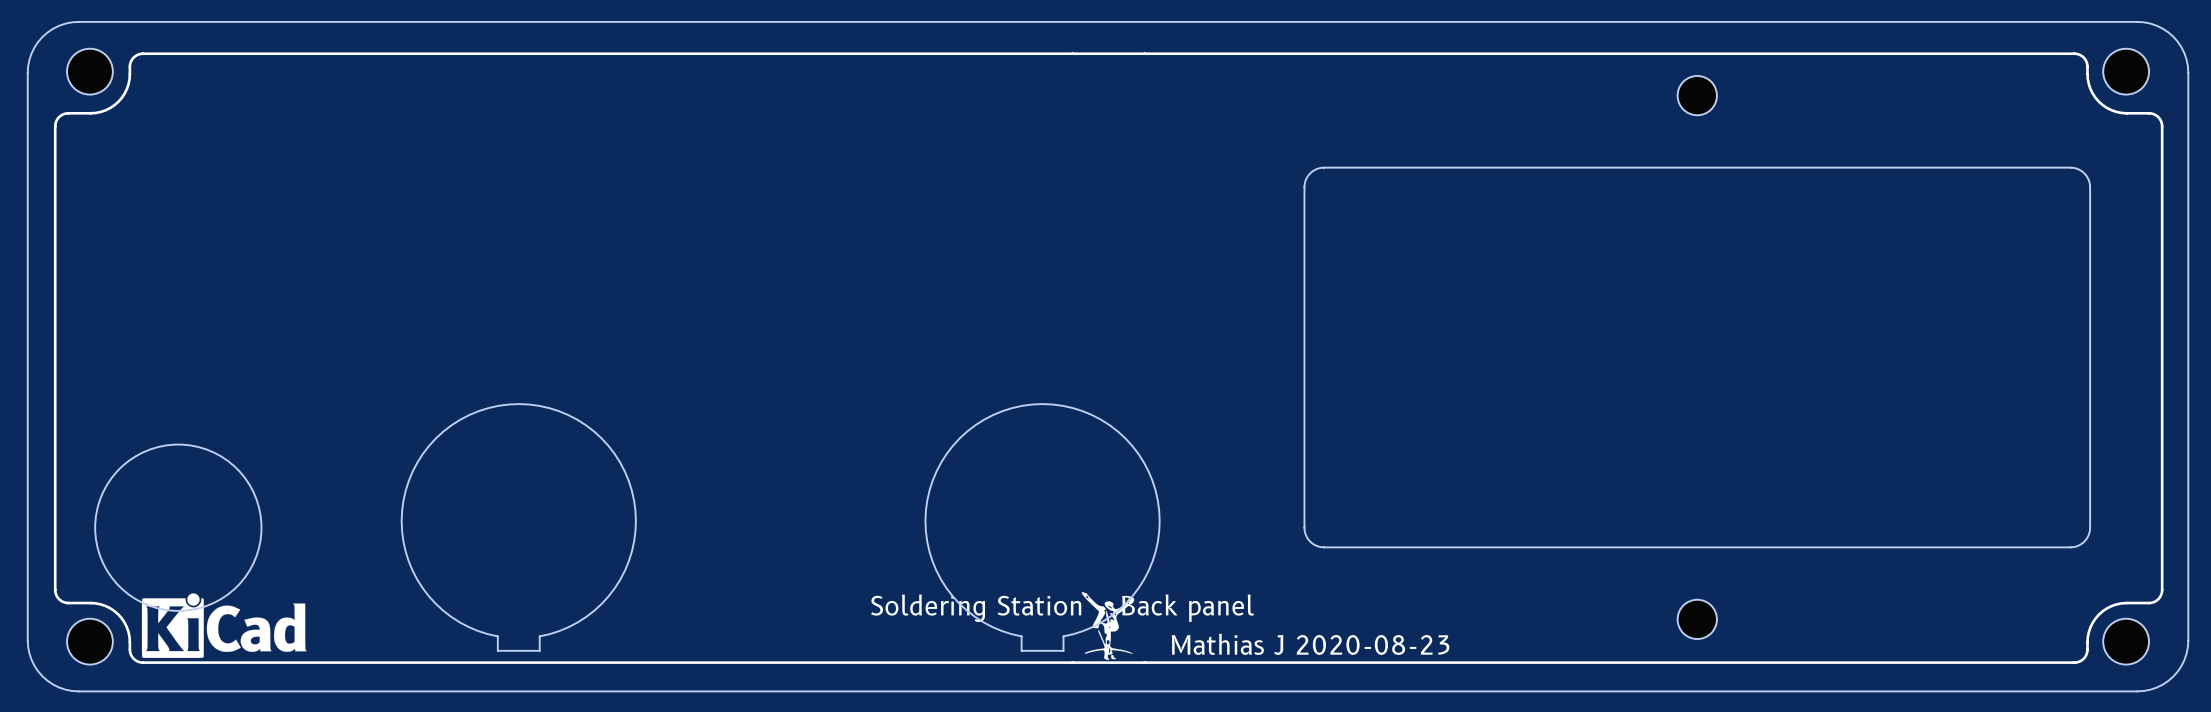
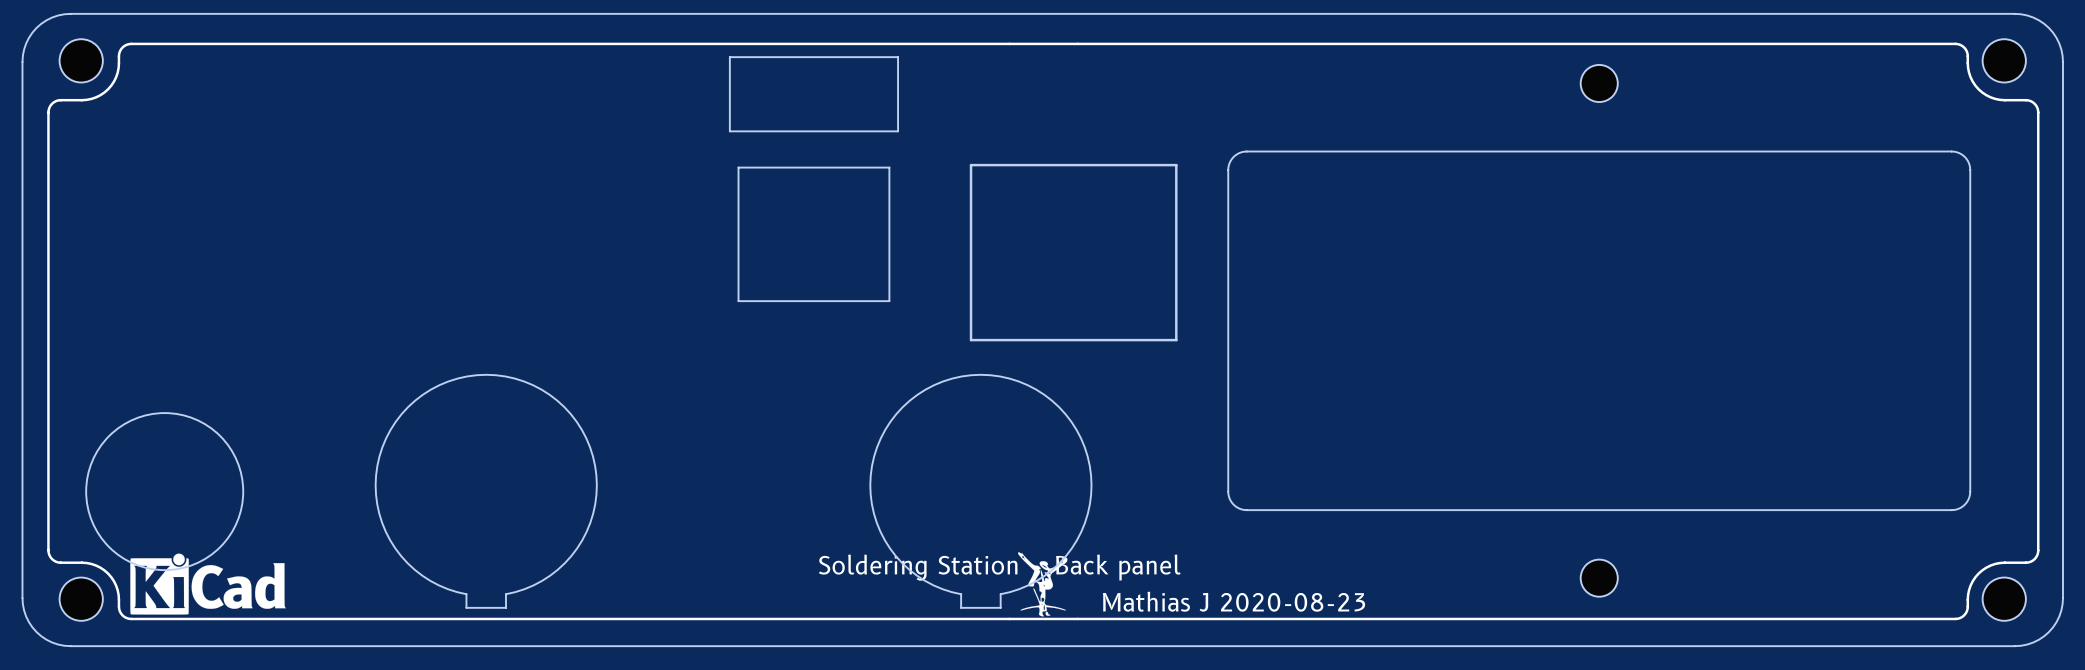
drawing: none -> [729, 56, 899, 133]
drawing: none -> [969, 163, 1178, 342]
drawing: none -> [737, 166, 891, 302]

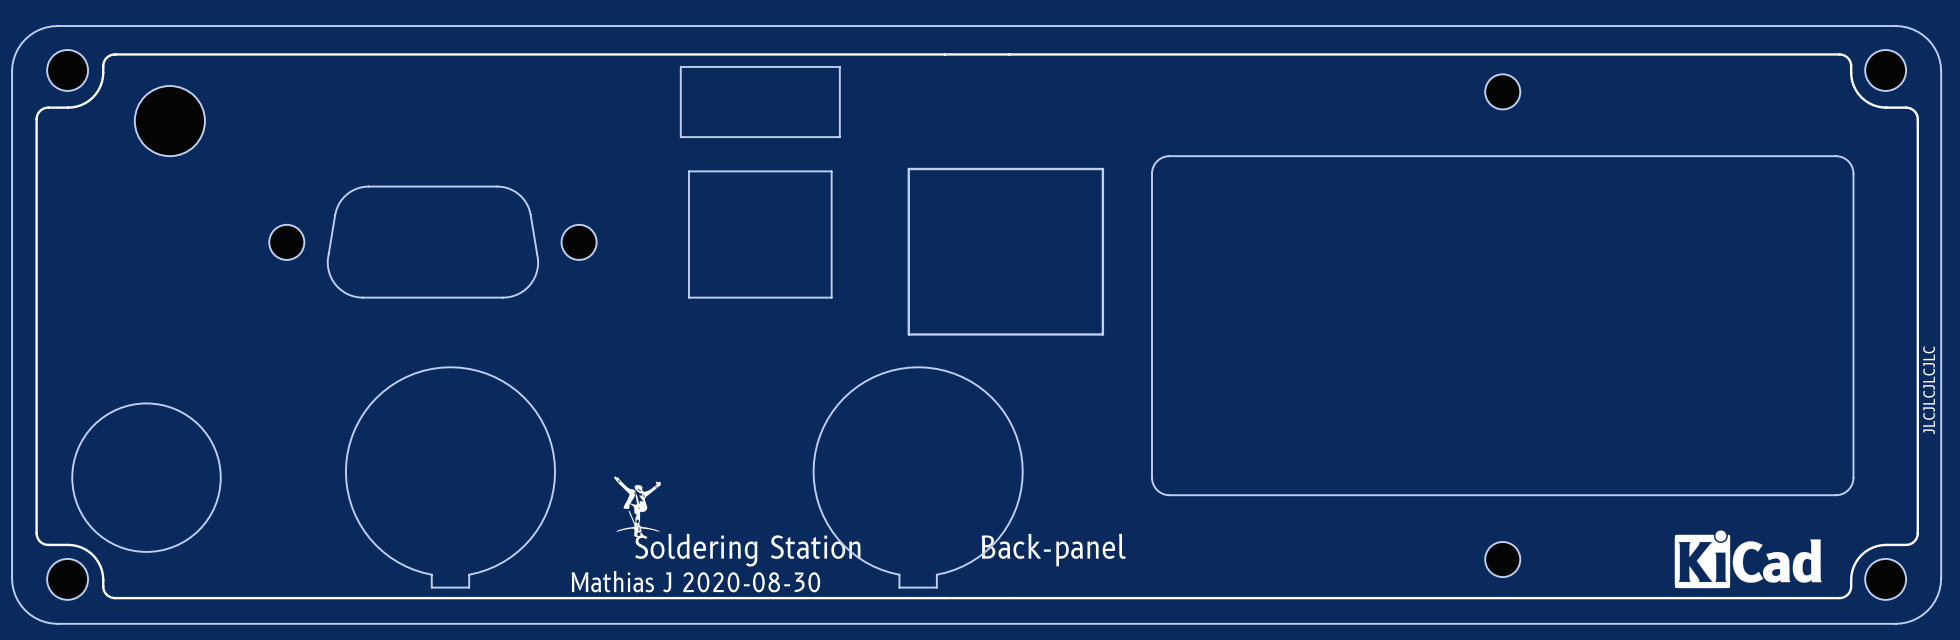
part: none -> (169, 121)
part: none -> (432, 242)
text: none -> JLCJLCJLCJLC (1929, 390)
drawing: none -> [614, 476, 661, 538]
drawing: none -> [1674, 530, 1822, 589]
drawing: [1017, 552, 1068, 617] -> none
drawing: [130, 553, 286, 615] -> none
text: Soldering Station Back panel (999, 567) -> Soldering Station Back-panel (880, 550)
text: none -> Mathias J 2020-08-30 (695, 581)
text: Mathias J 2020-08-23 (1234, 601) -> none

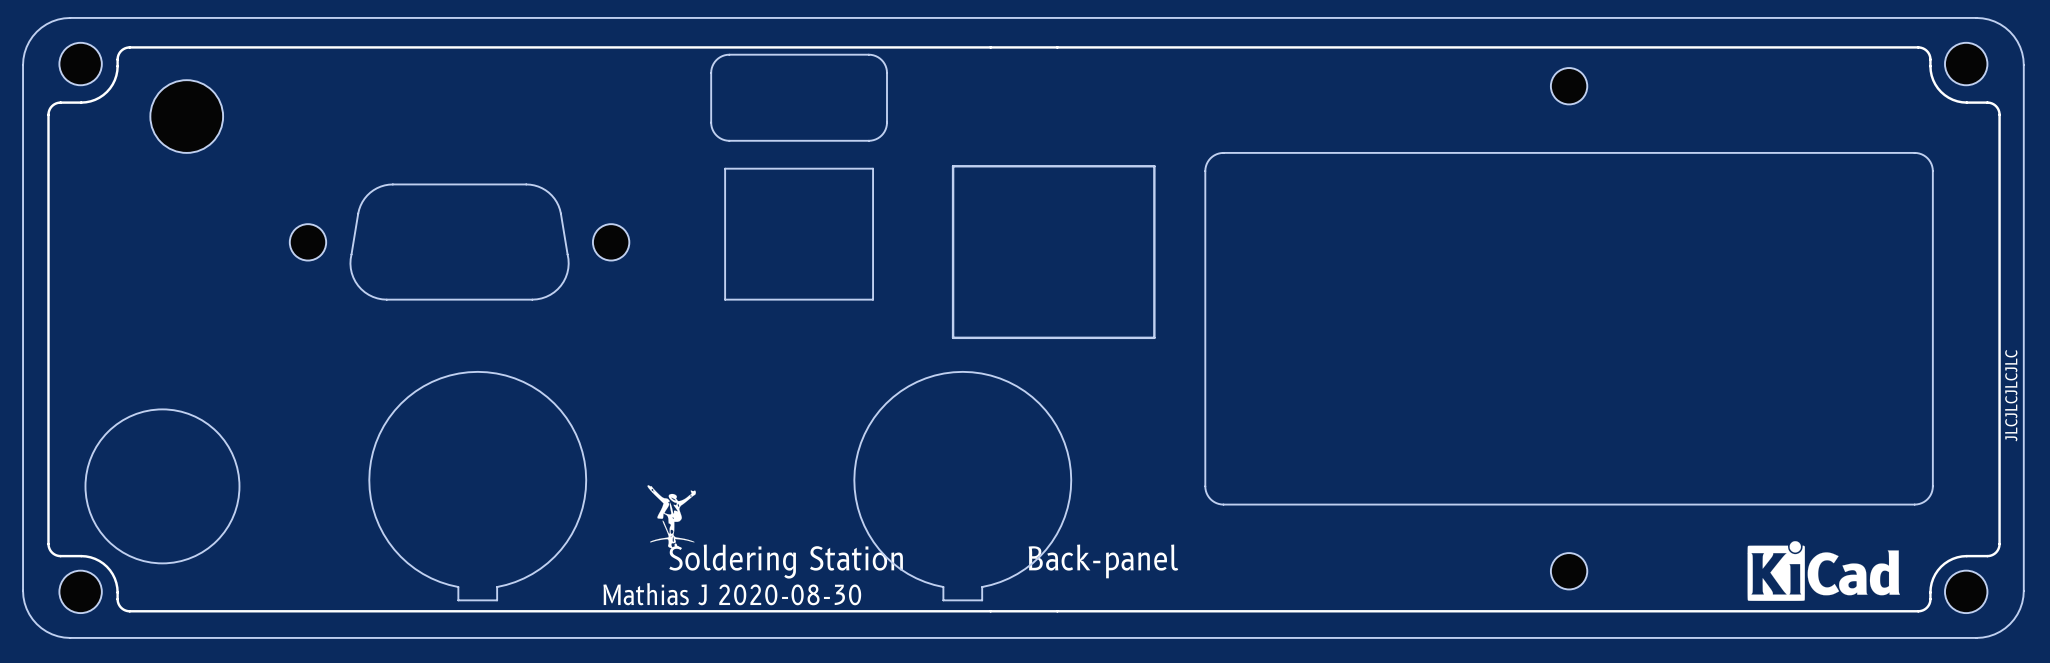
drawing shape: [680, 66, 841, 138] -> [710, 53, 888, 142]

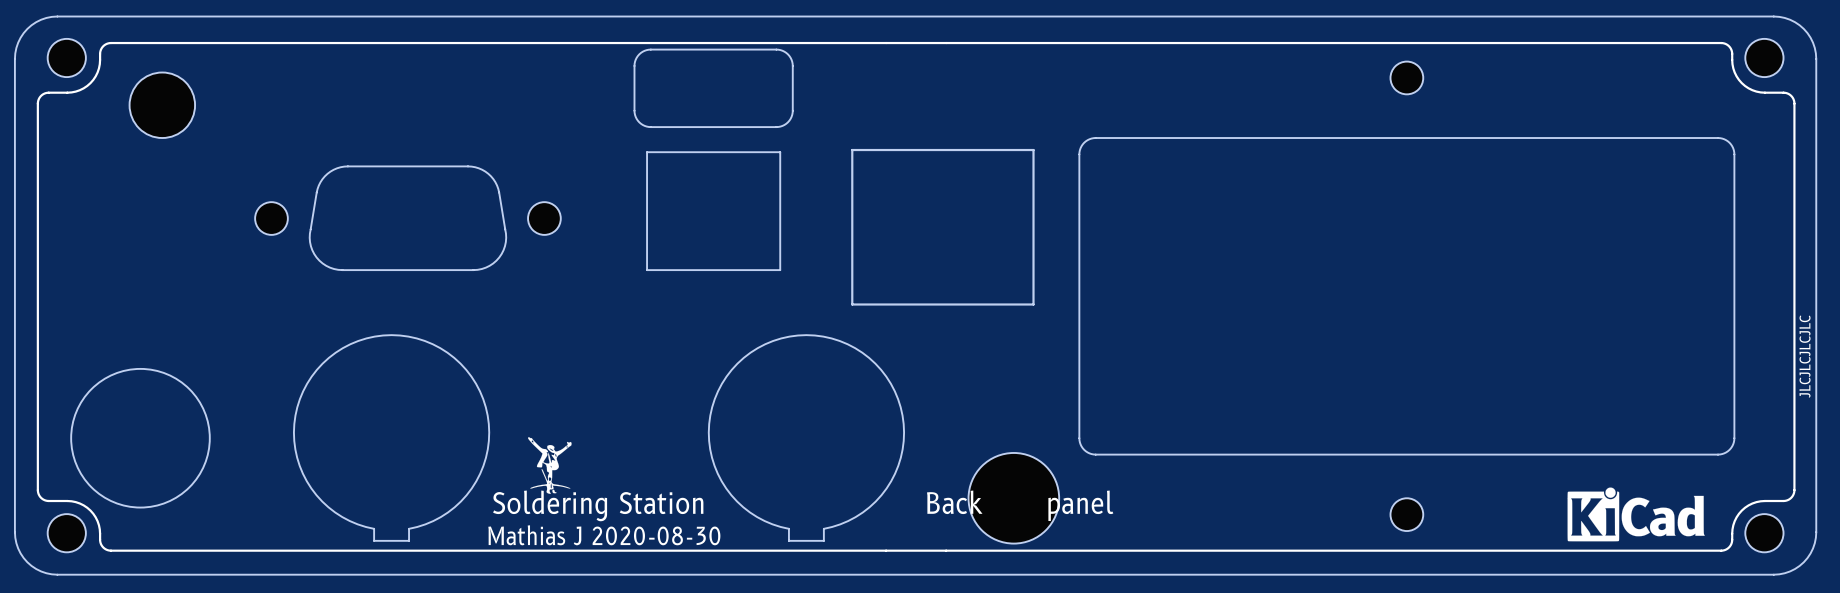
drawing position: (477, 486) -> (391, 437)
drawing position: (962, 486) -> (806, 437)
drawing position: (671, 516) -> (549, 465)
part: none -> (1013, 498)
text: Soldering Station Back-panel (923, 561) -> Soldering Station (598, 505)
text: none -> Back panel (1020, 505)
text position: Mathias J 2020-08-30 (732, 594) -> Mathias J 2020-08-30 (604, 535)

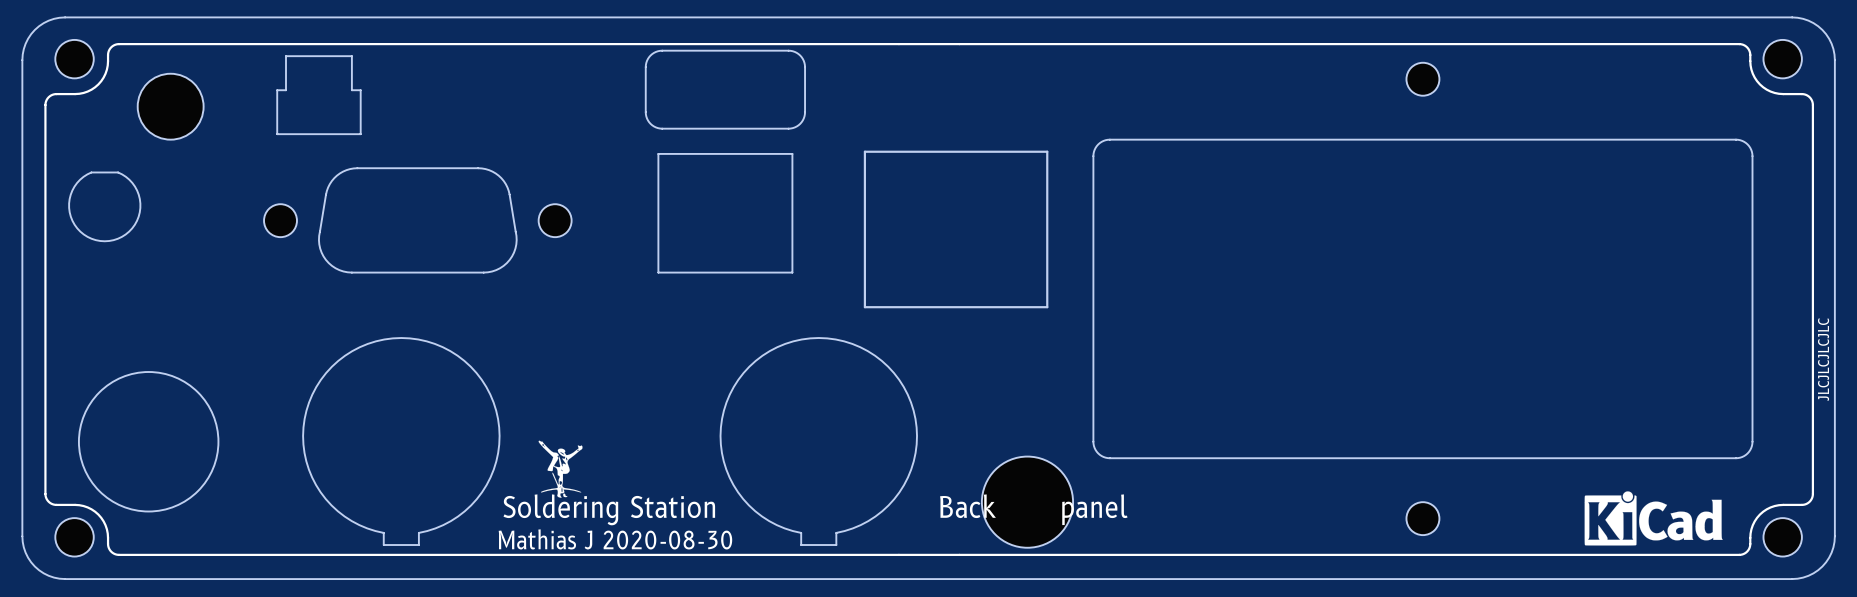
drawing: none -> [276, 55, 362, 135]
drawing: none -> [68, 171, 141, 242]

